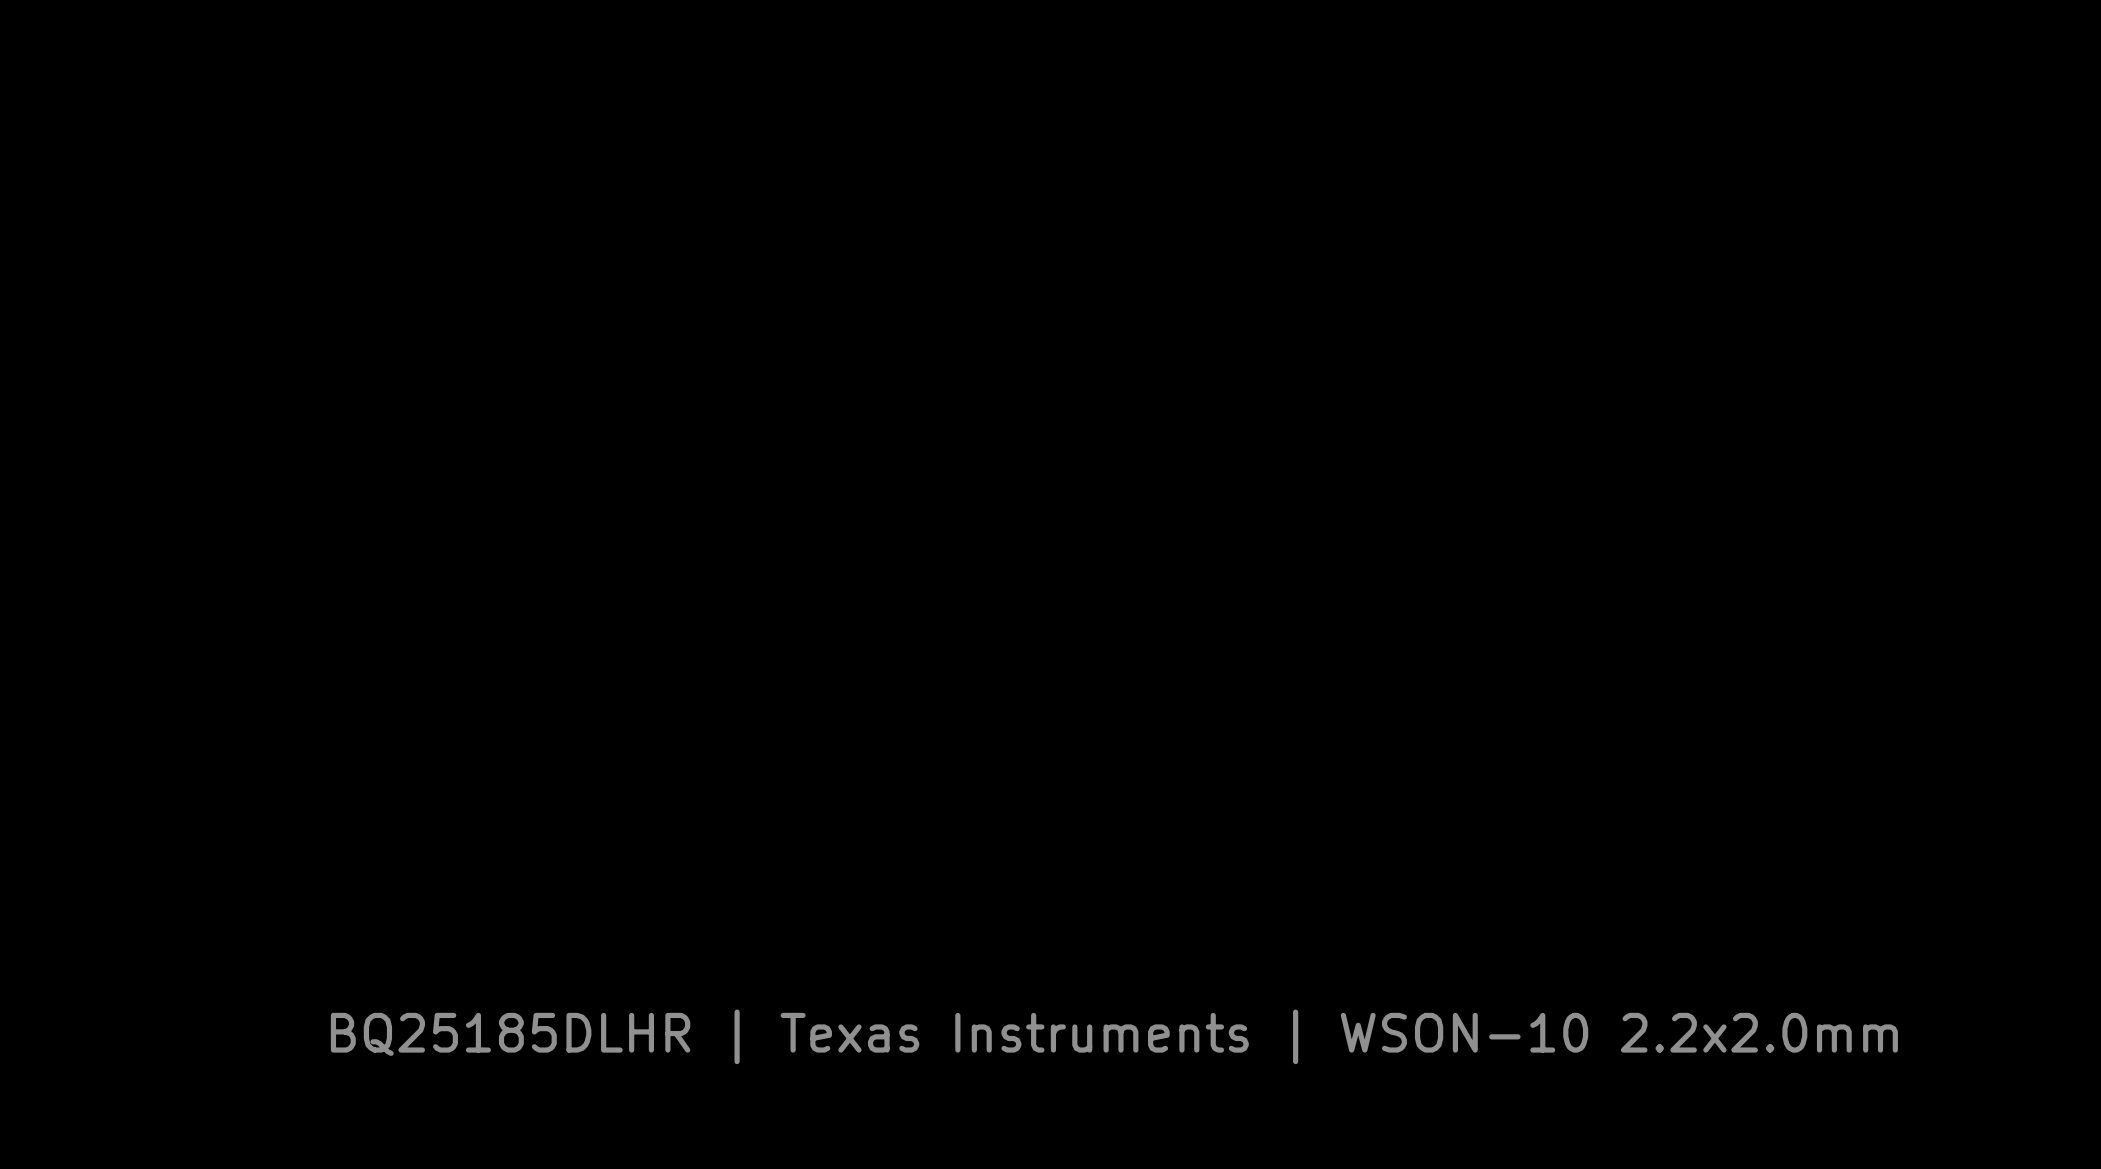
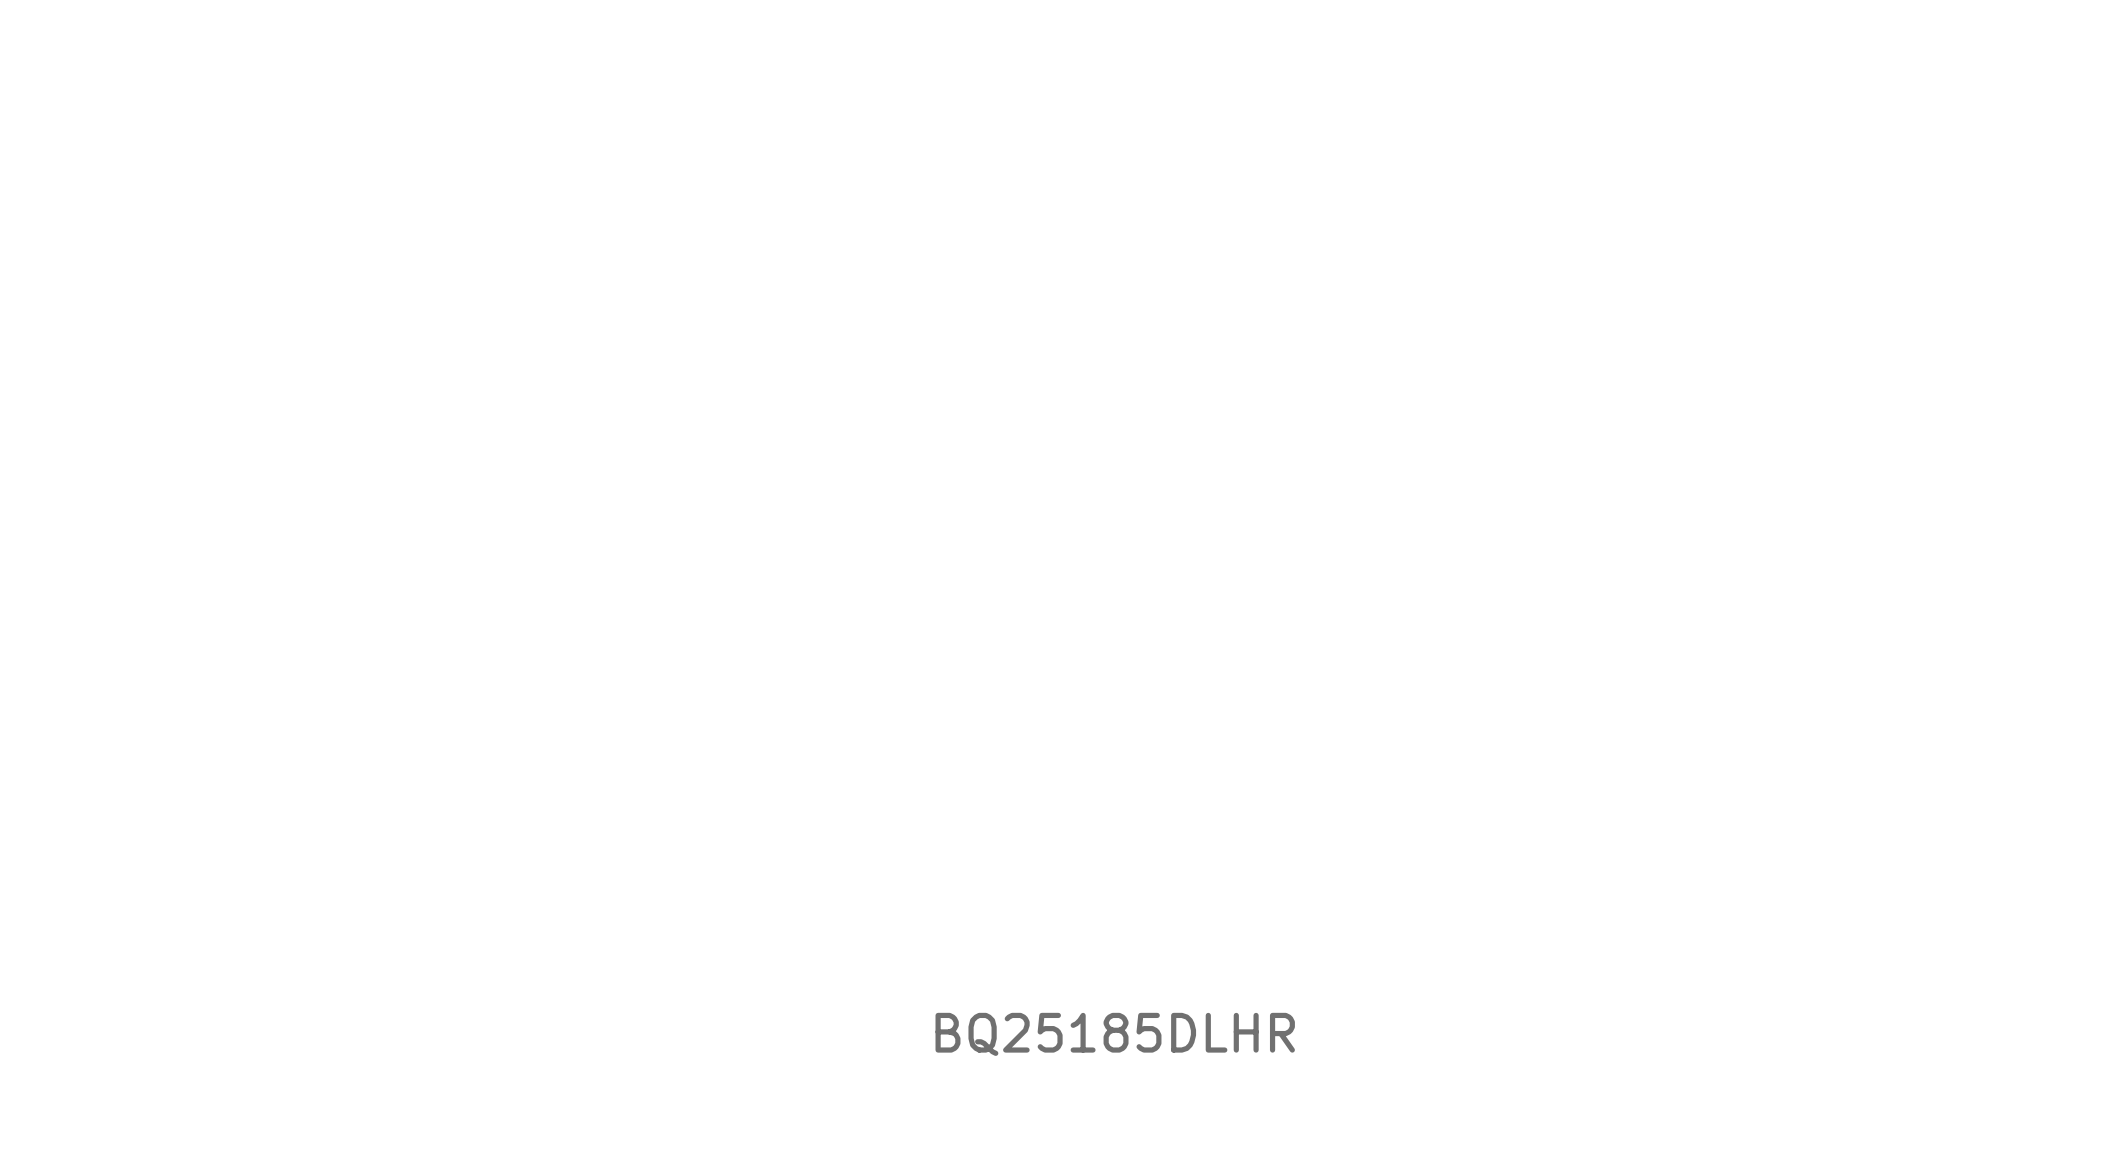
part value: BQ25185DLHR | Texas Instruments | WSON-10 2.2x2.0mm (1114, 1036) -> BQ25185DLHR (1115, 1034)

